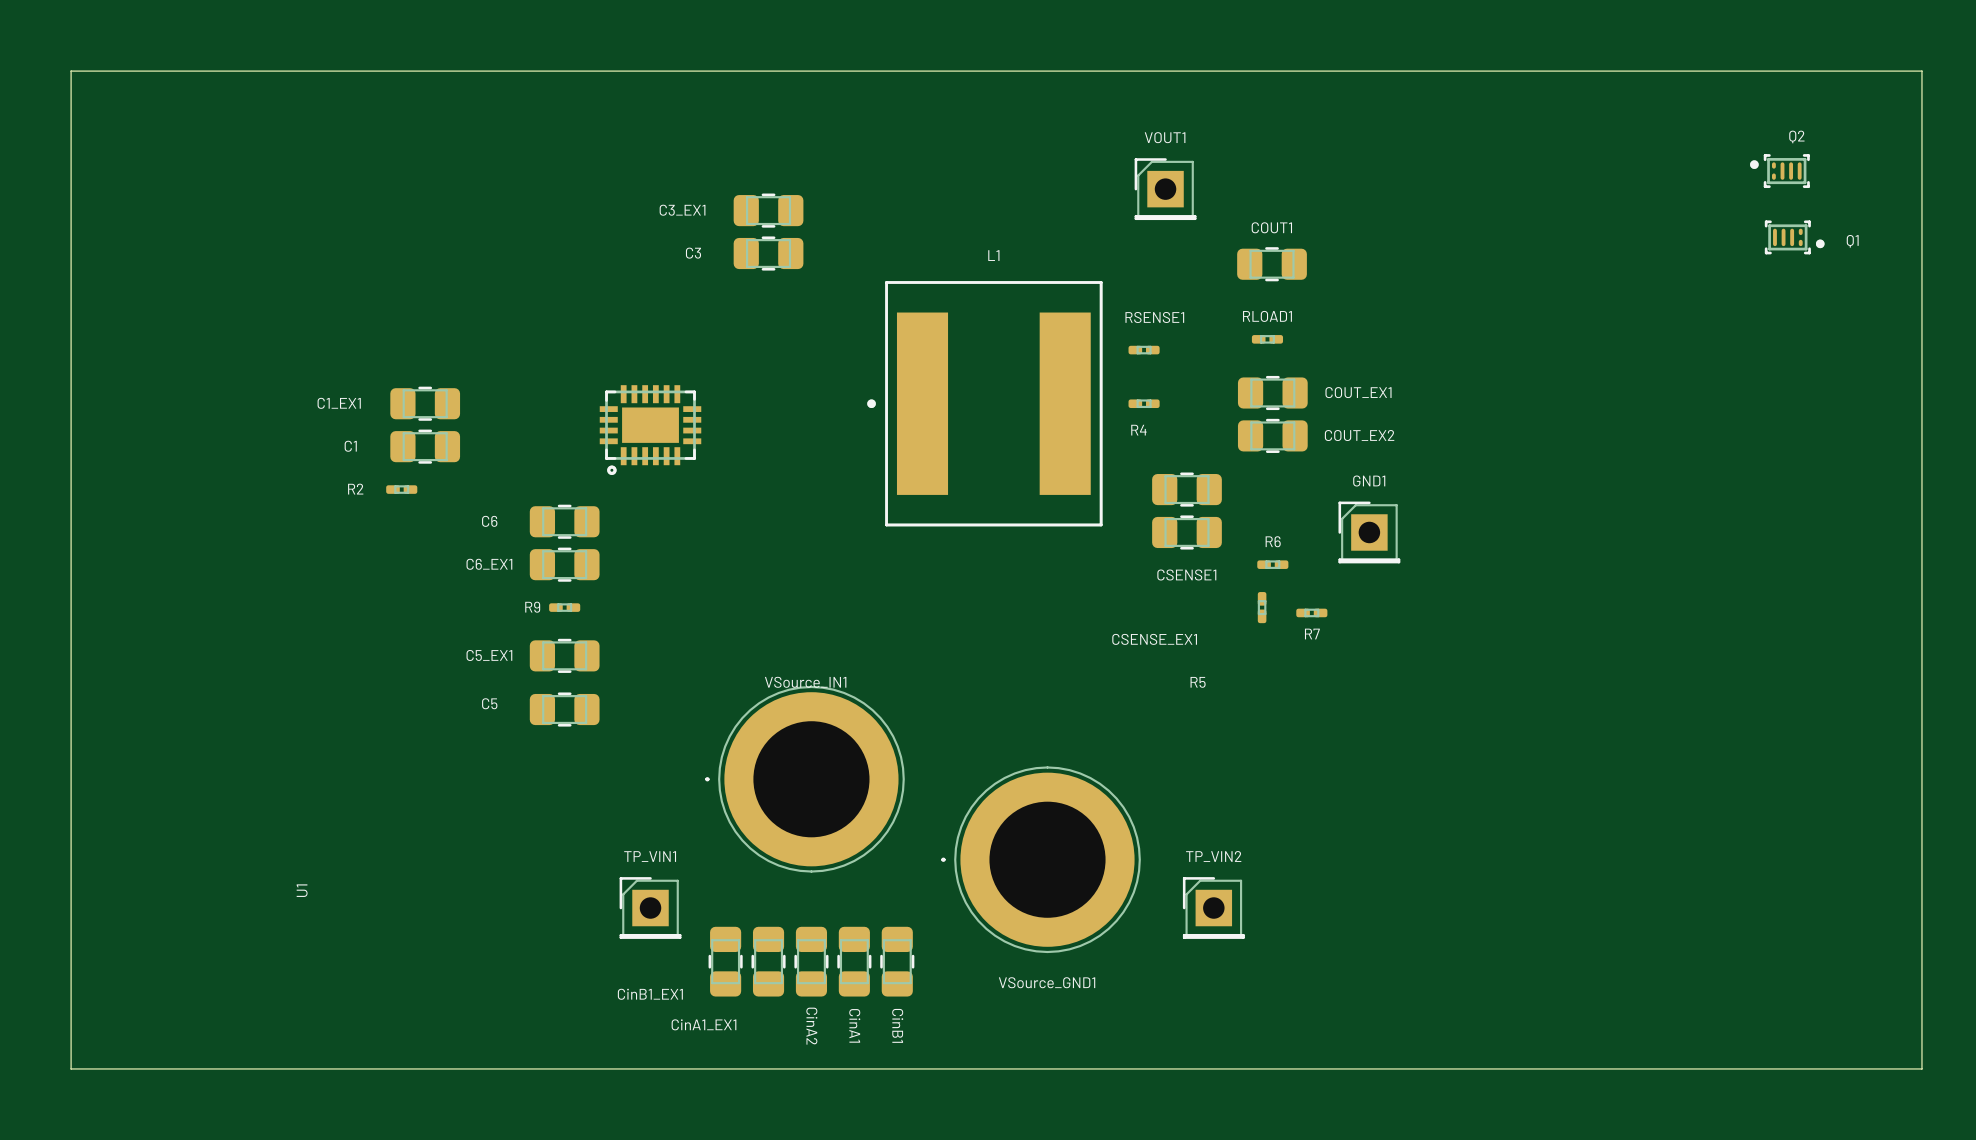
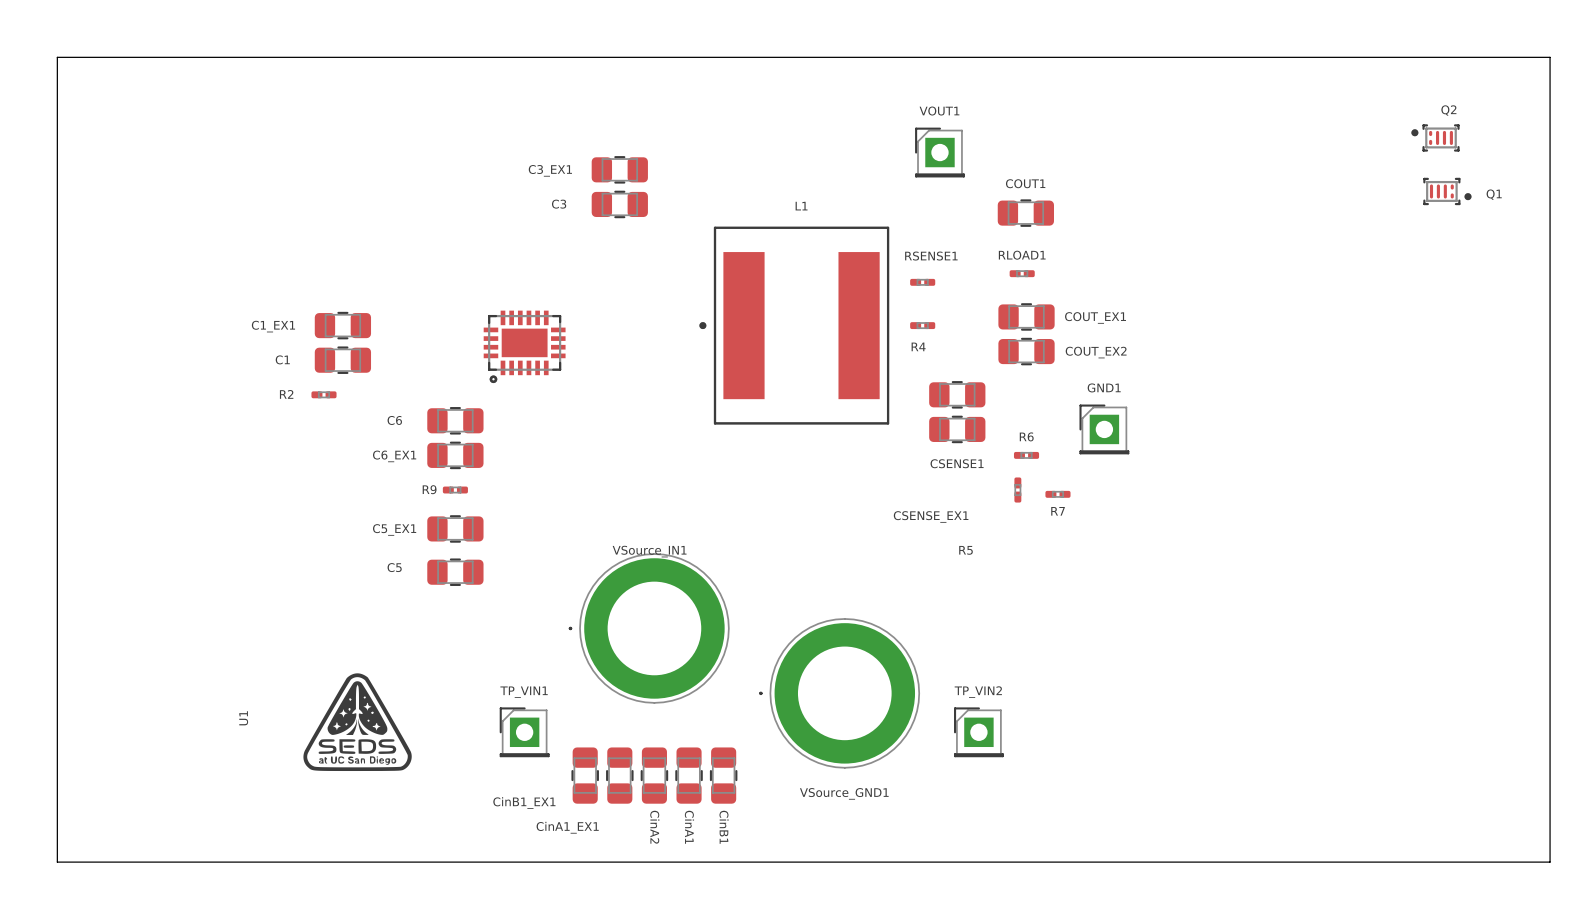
drawing: none -> [303, 673, 412, 772]

